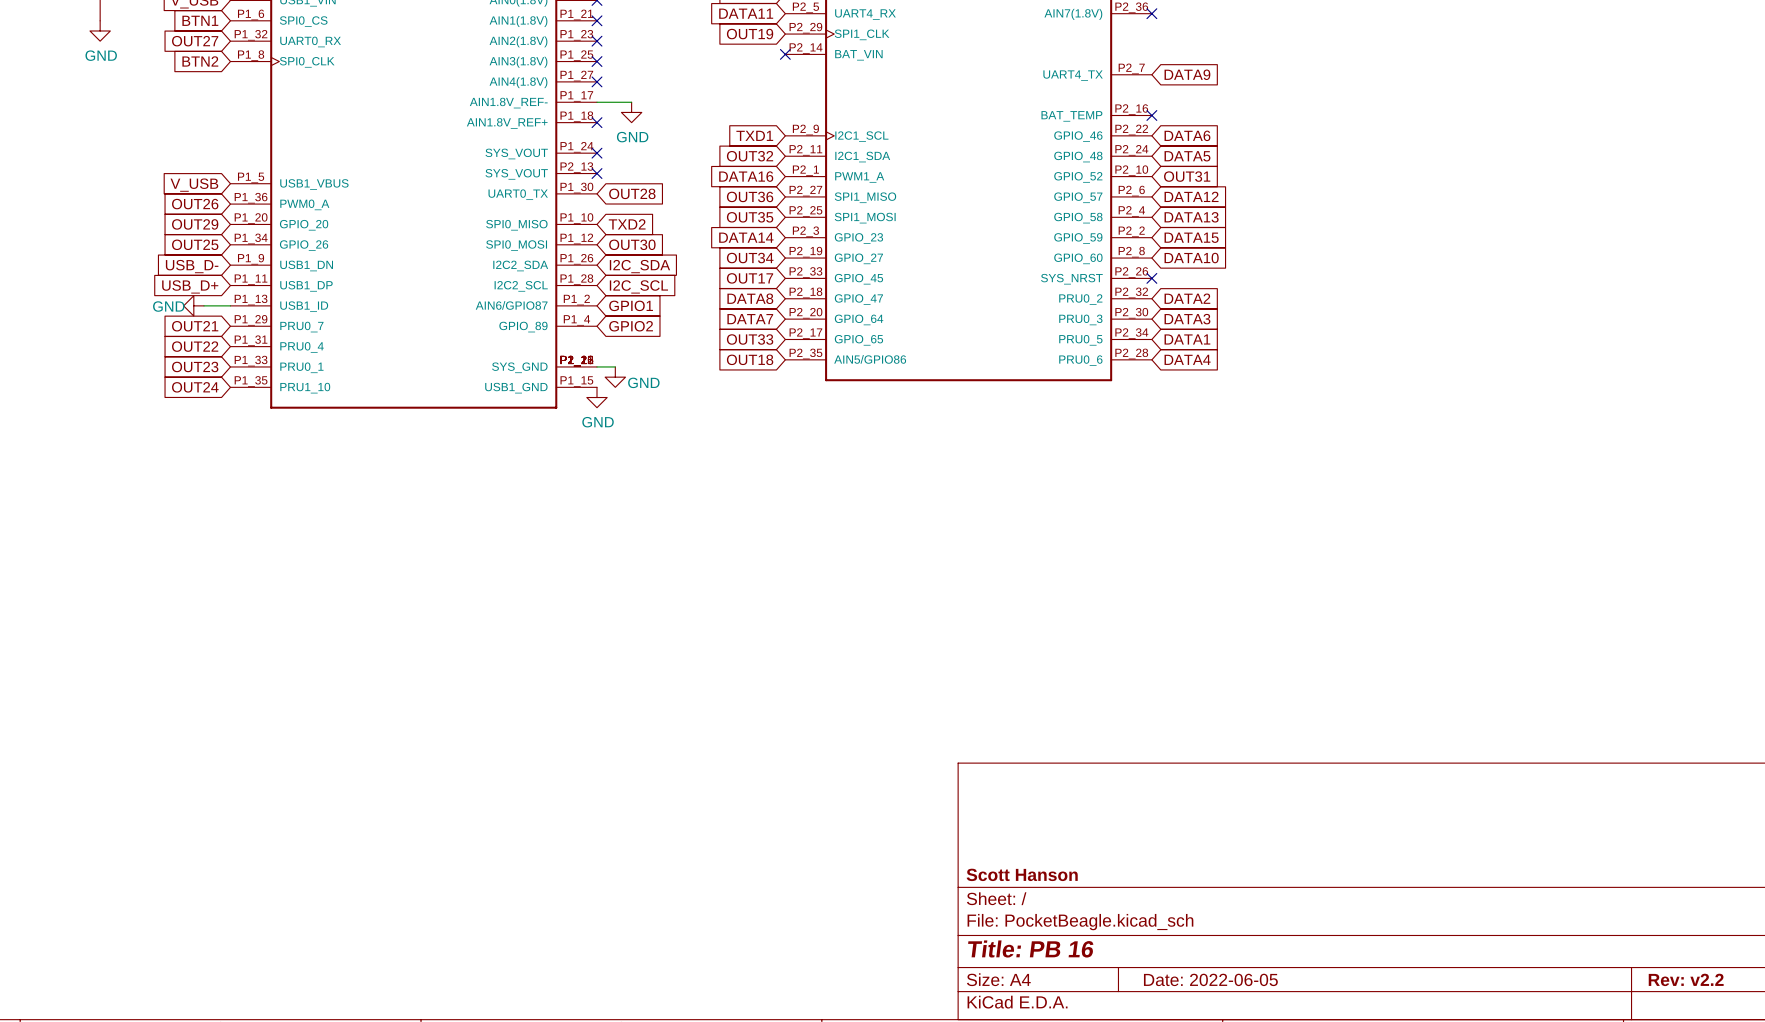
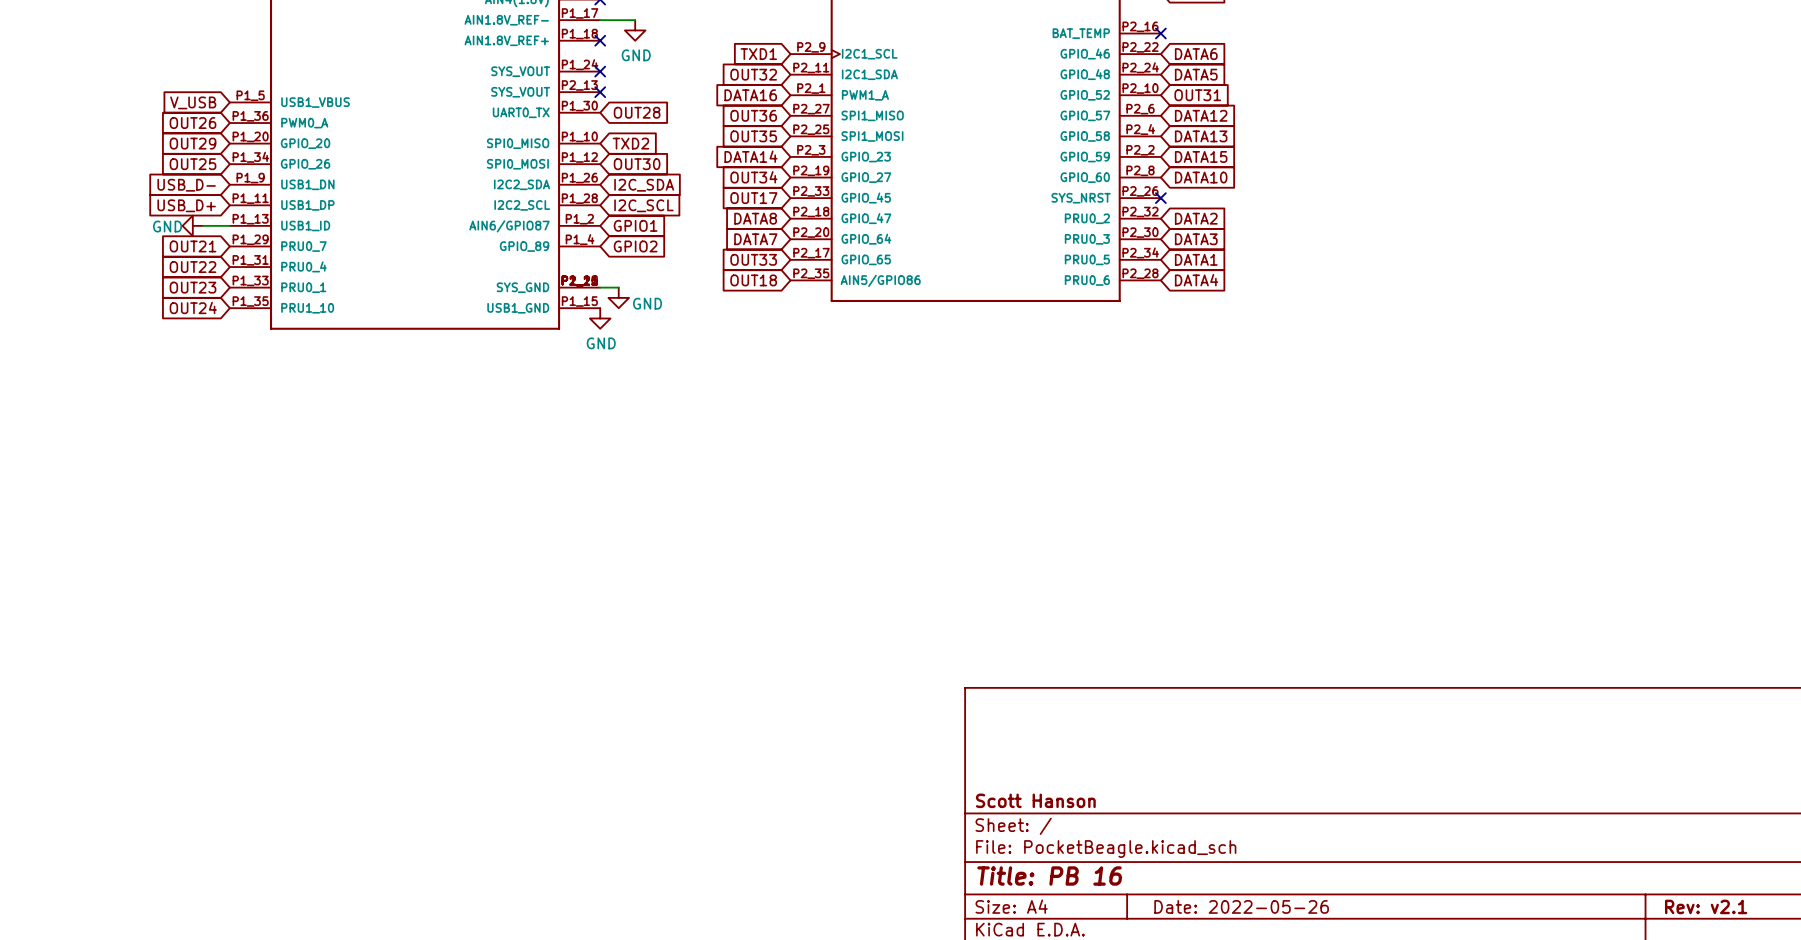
title block: Date: 2022-06-05 (1210, 979) -> Date: 2022-05-26 (1241, 906)
title block: Rev: v2.2 (1686, 979) -> Rev: v2.1 (1706, 906)

